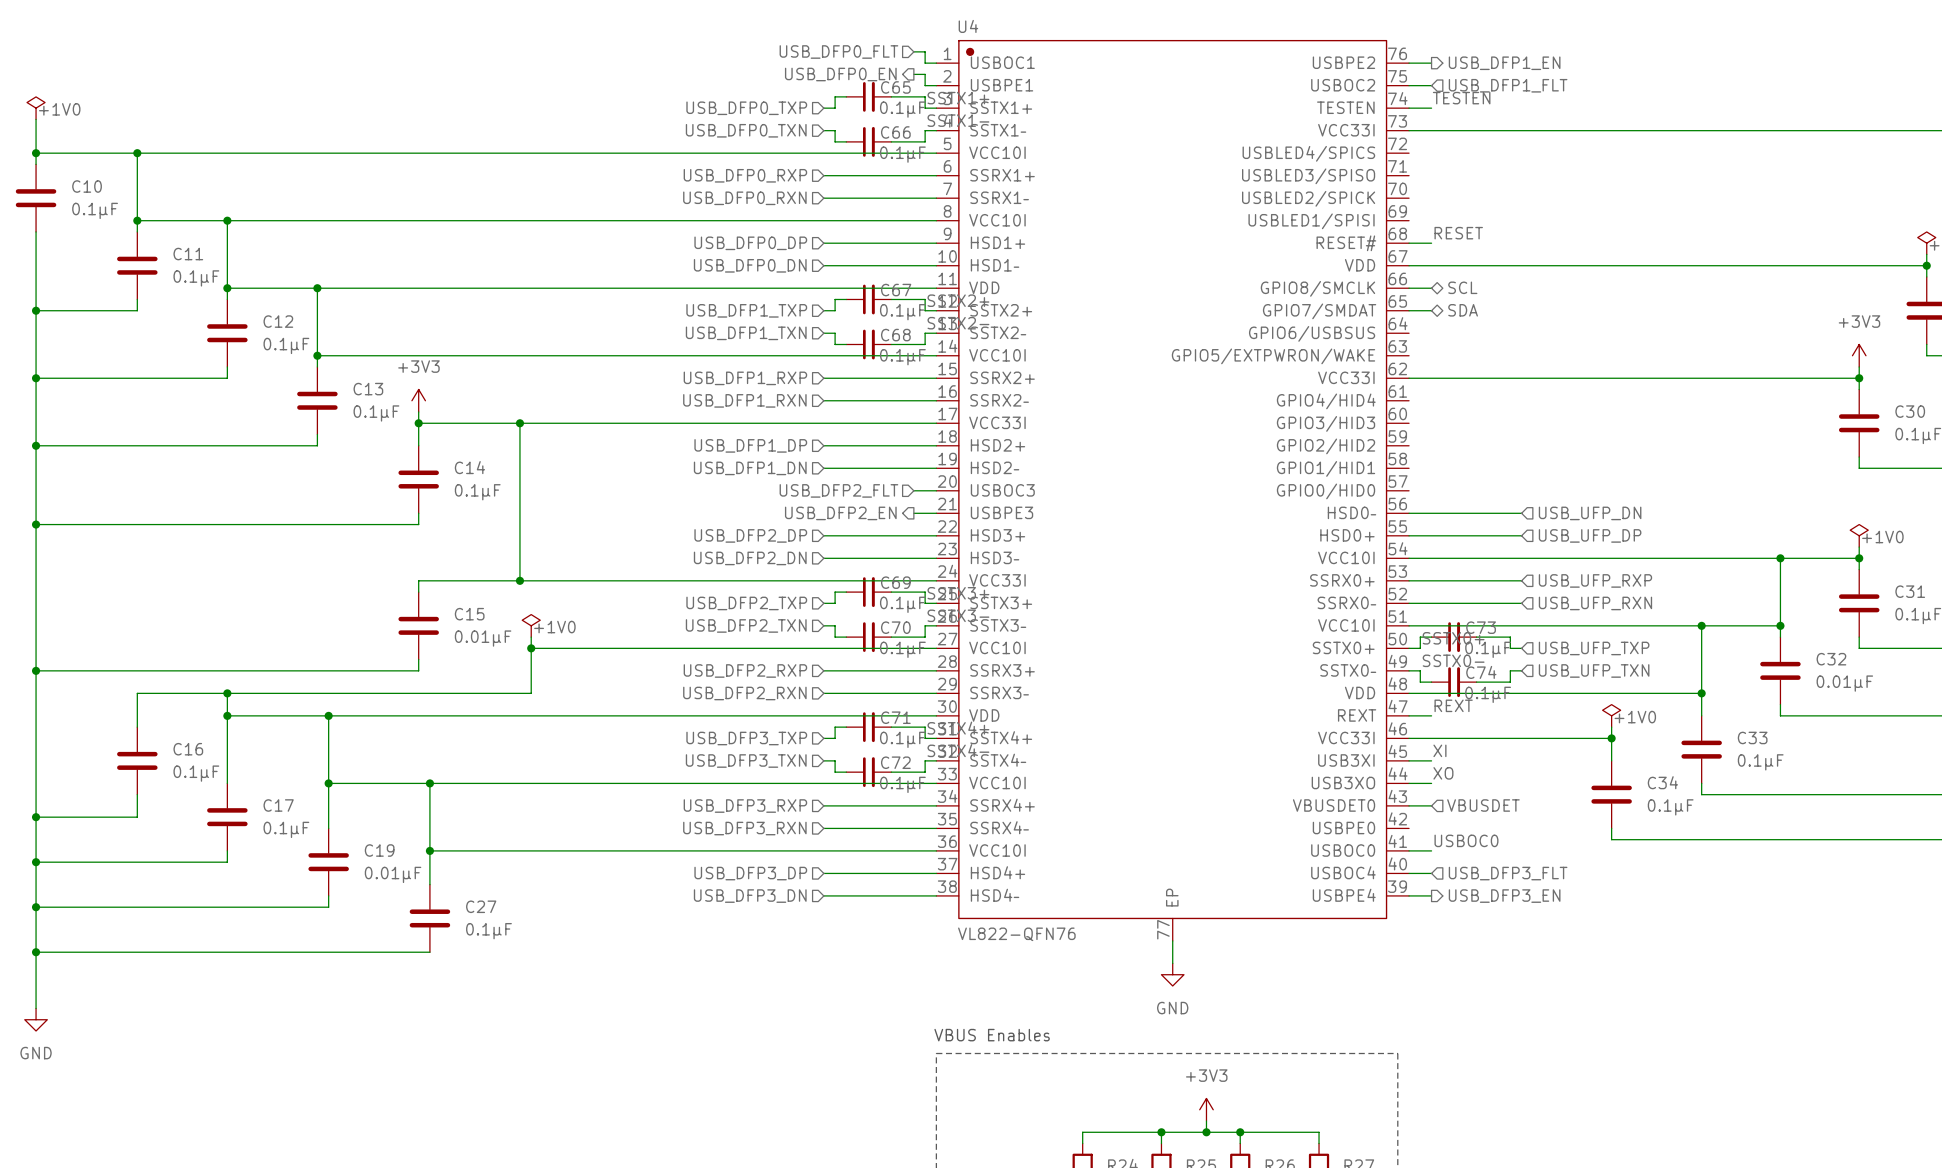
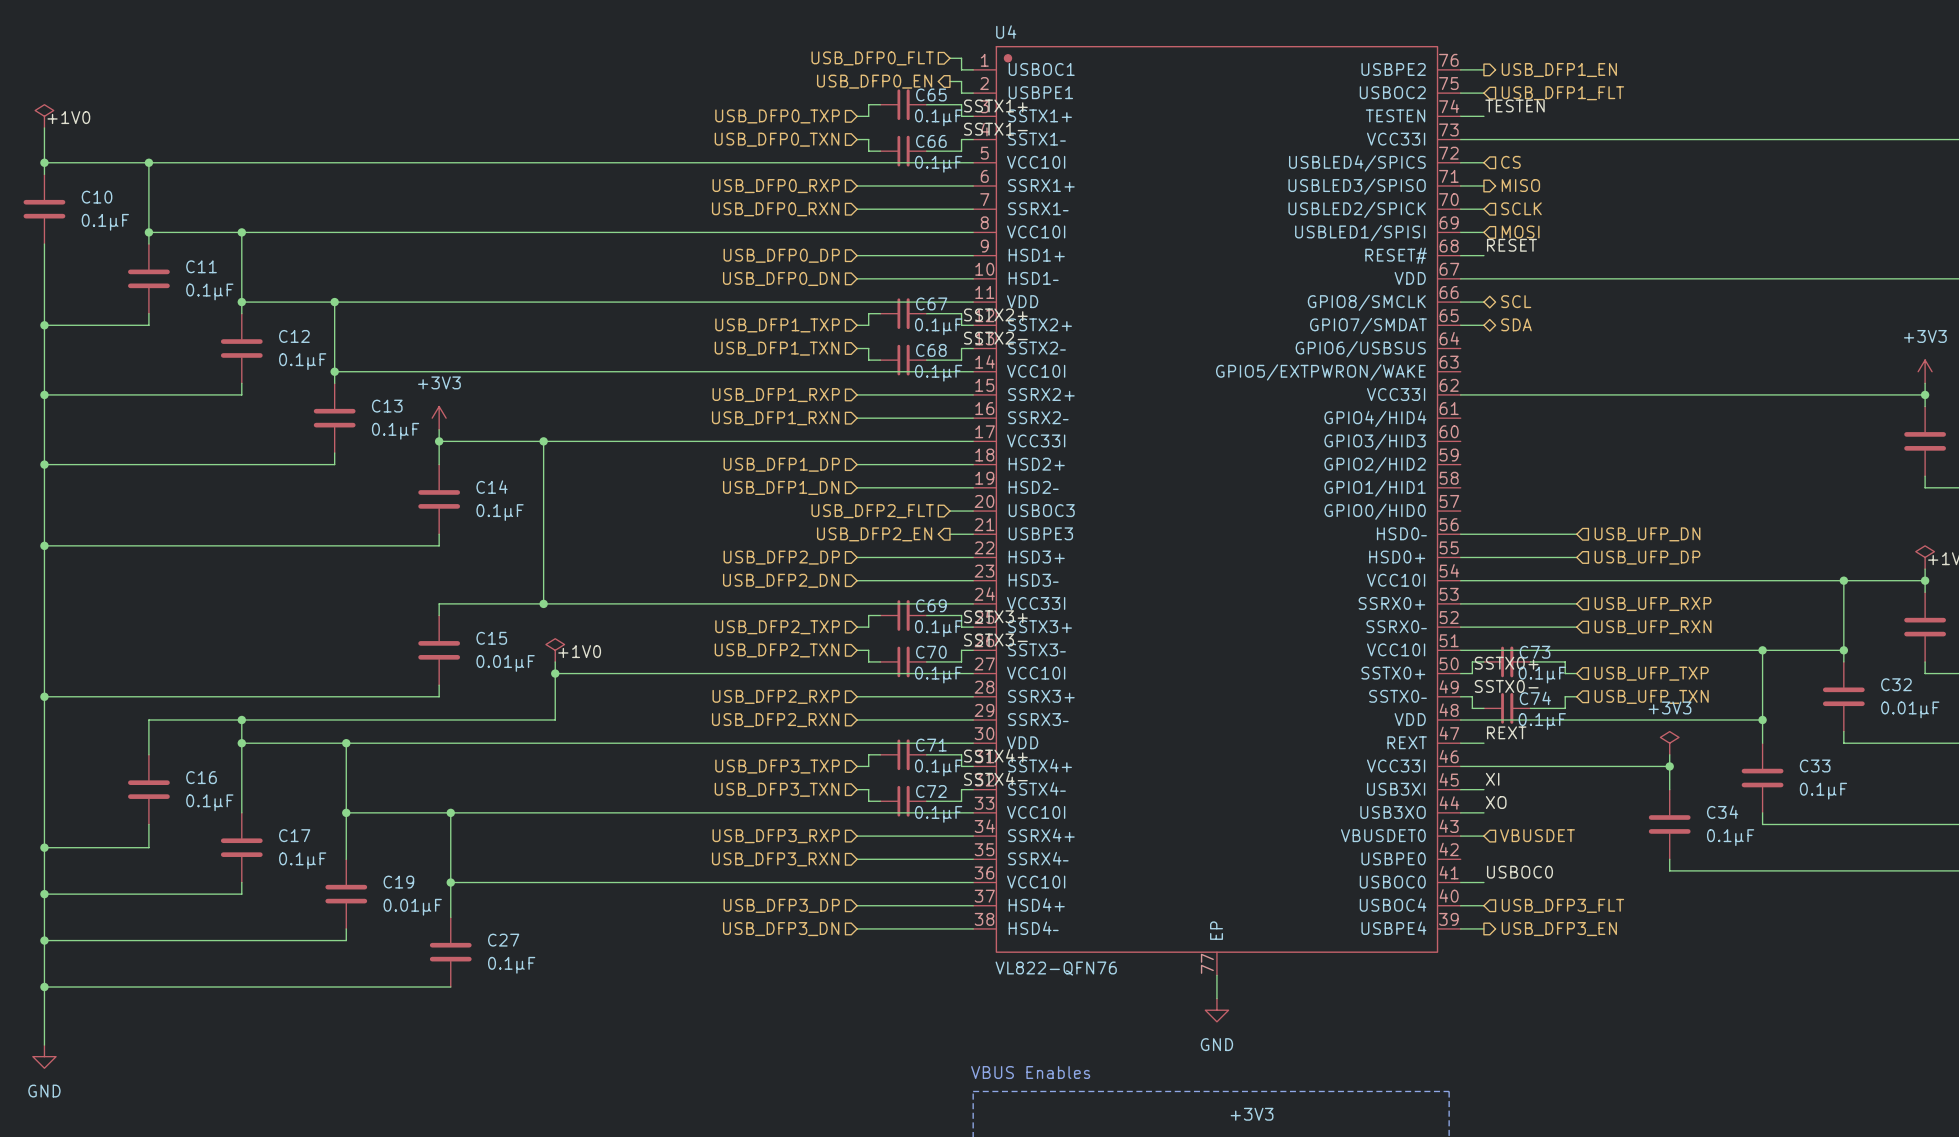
hierarchical label: none -> CS (1510, 162)
wire: none -> (1460, 162) (1483, 162)
wire: none -> (1460, 185) (1483, 185)
hierarchical label: none -> MISO (1520, 185)
hierarchical label: none -> SCLK (1521, 208)
wire: none -> (1460, 209) (1483, 209)
wire: none -> (1460, 232) (1483, 232)
hierarchical label: none -> MOSI (1520, 231)
power symbol text: none -> +3V3 (1669, 707)
label: +1V0 (1635, 717) -> none

